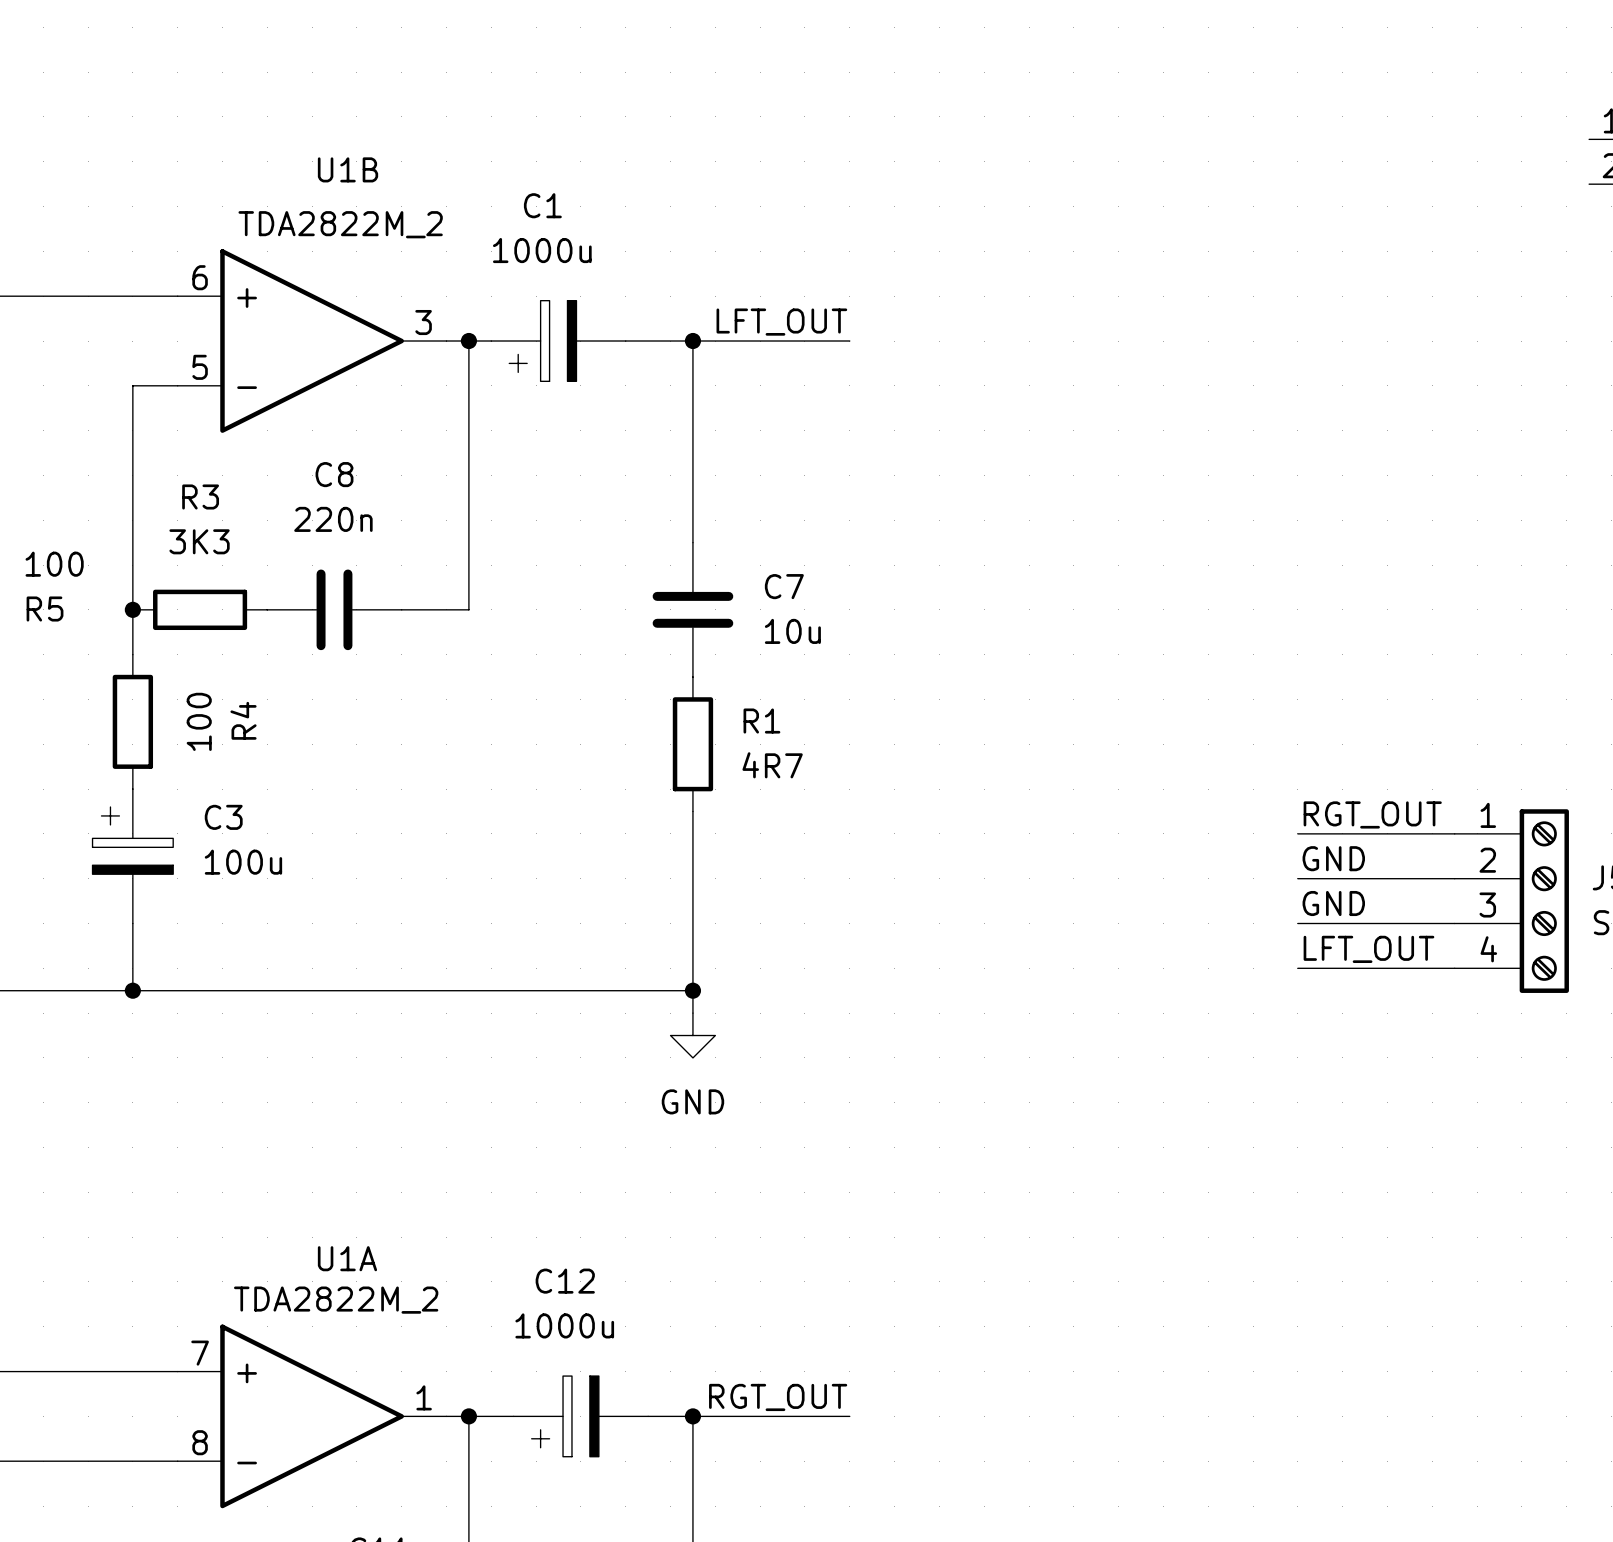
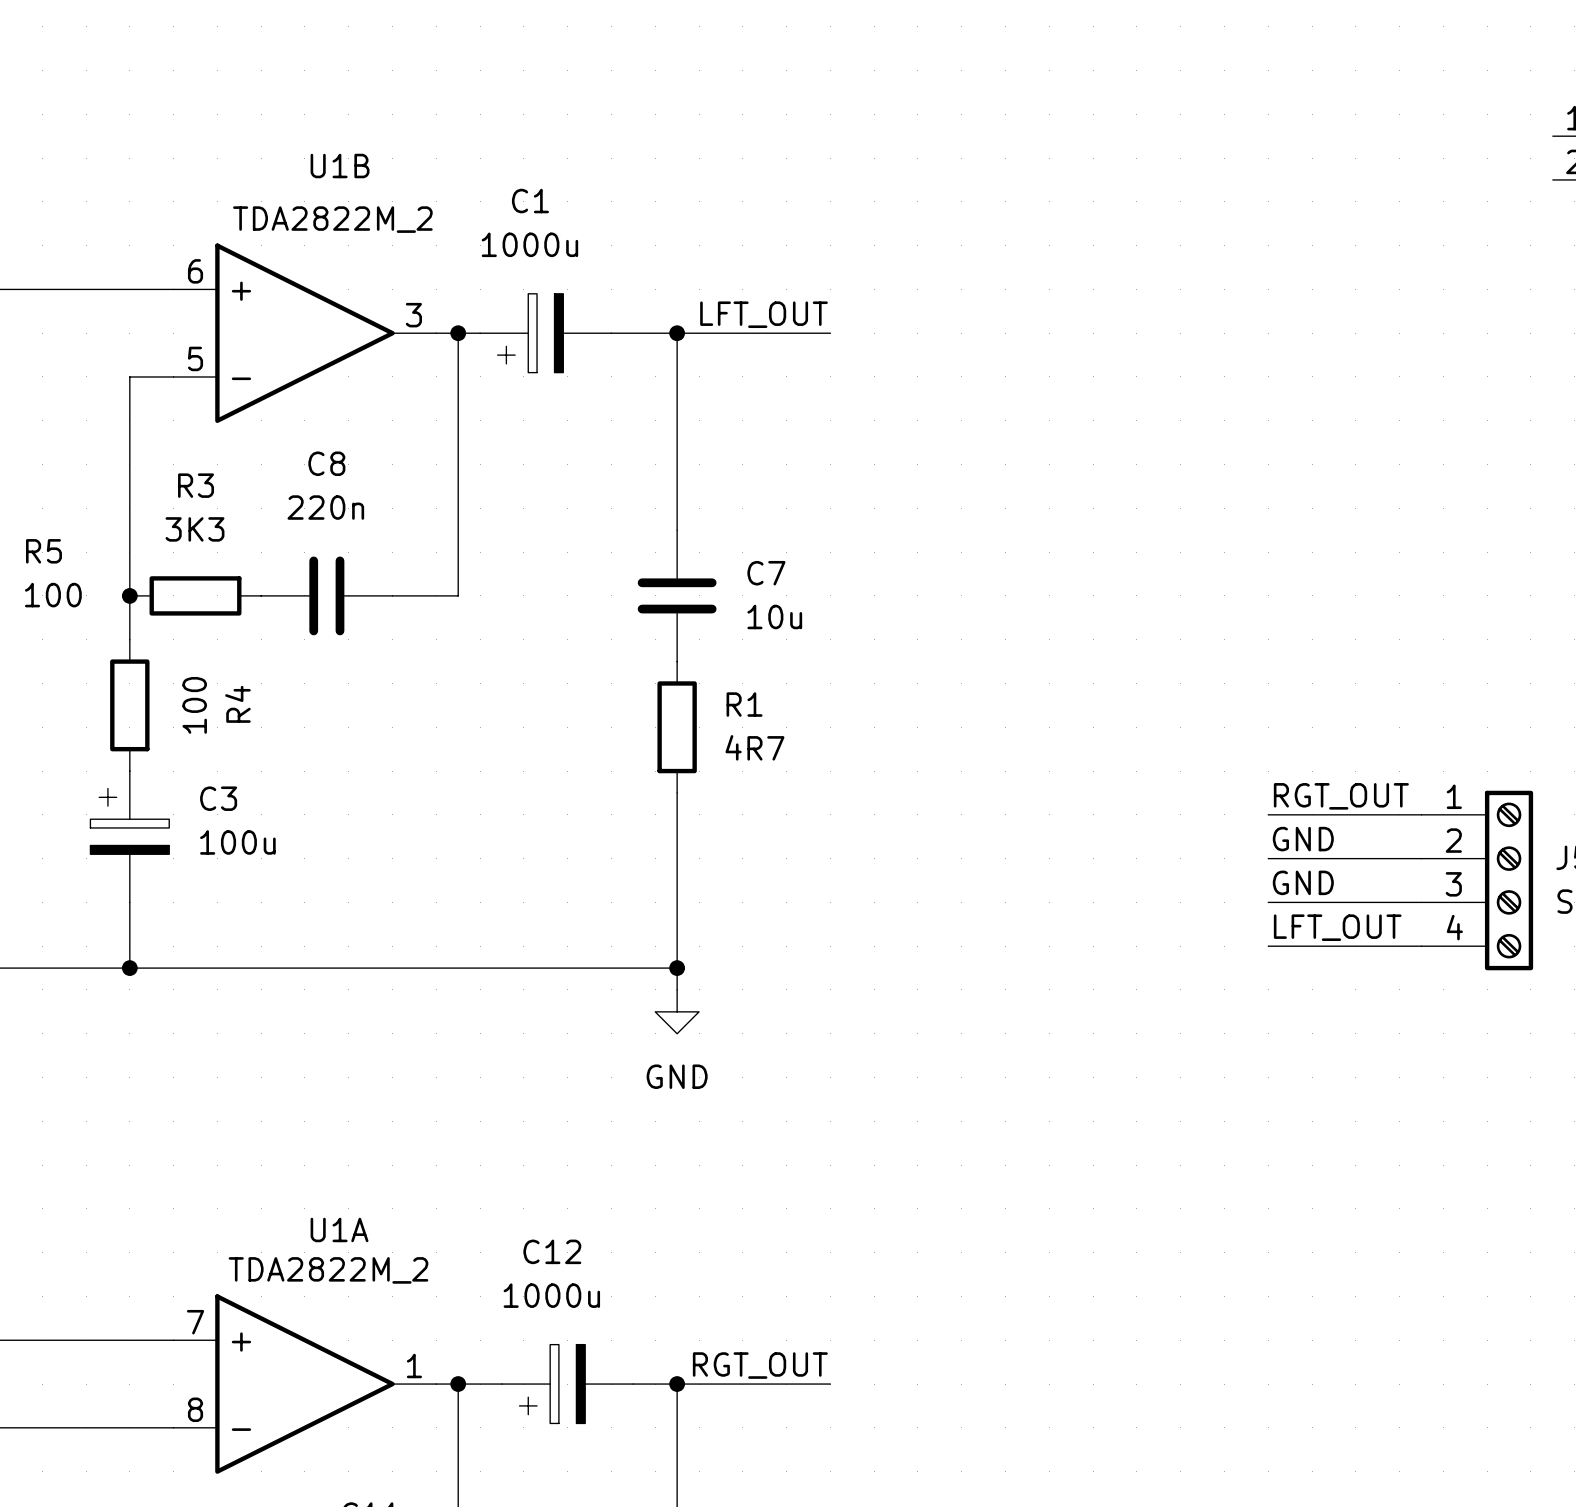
R5 value position: 100 (54, 564) -> 100 (53, 595)
R5 name position: R5 (45, 609) -> R5 (43, 551)

